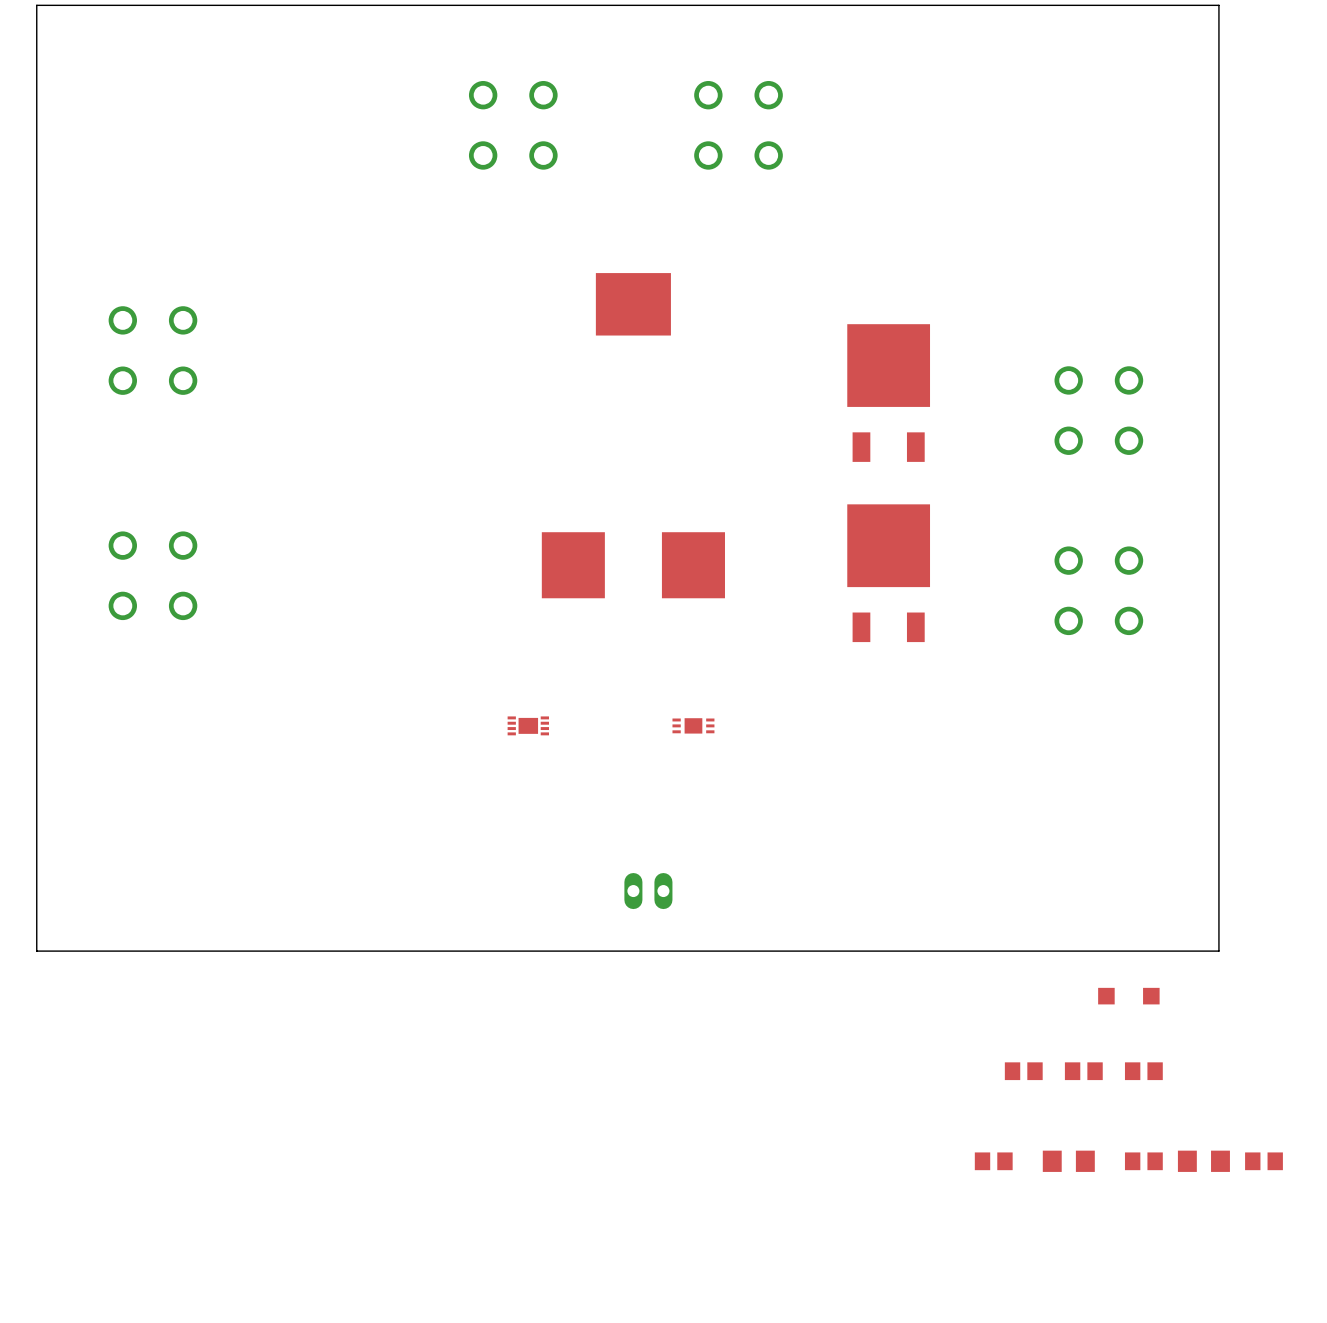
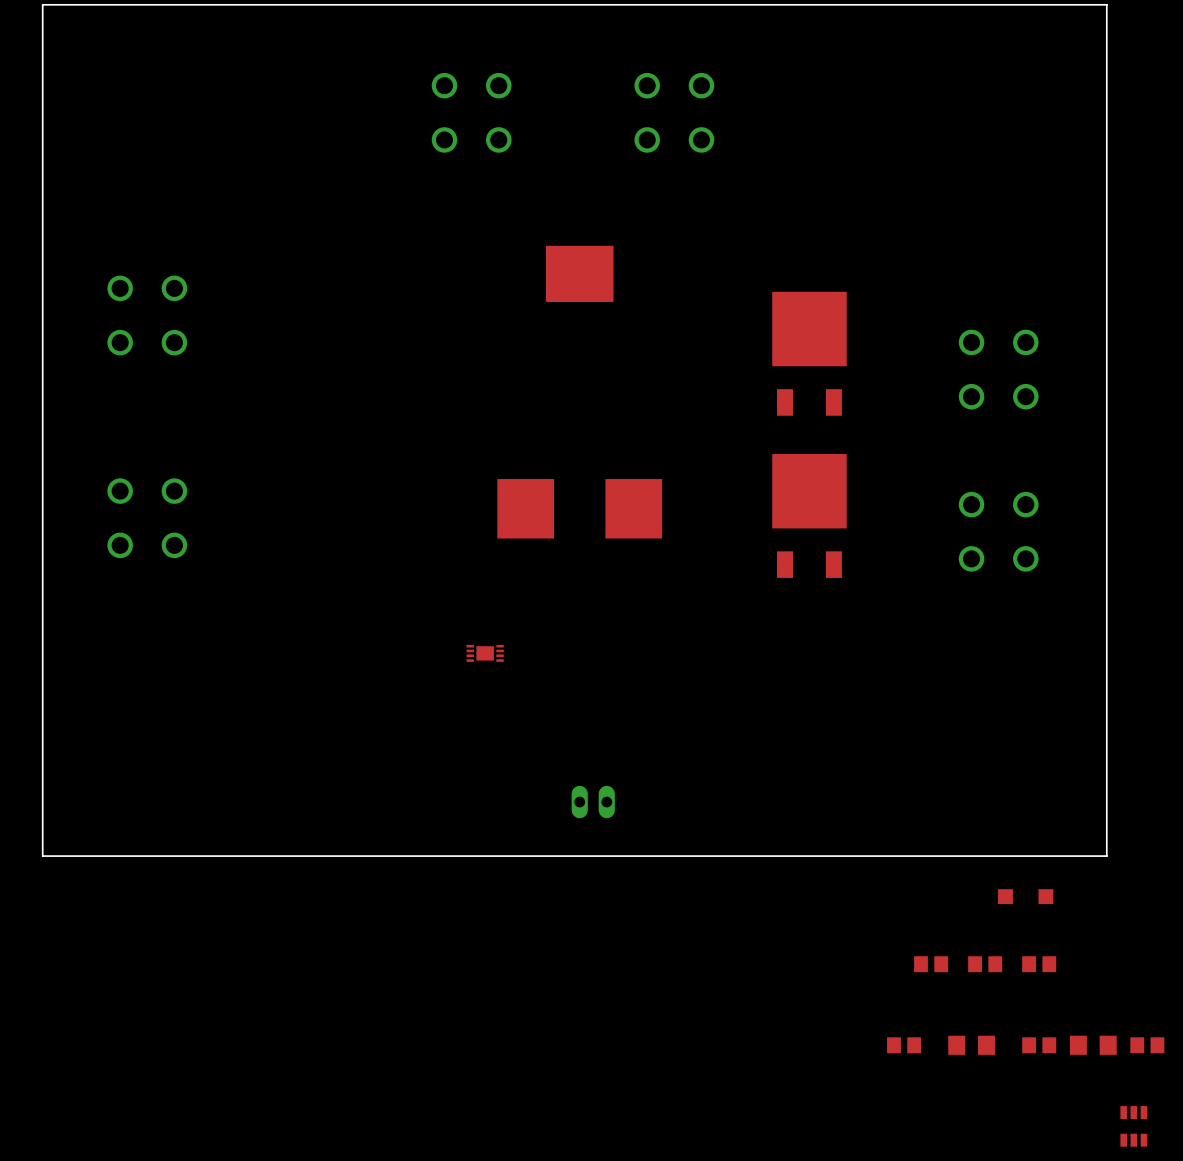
part: (693, 725) -> none
part: none -> (1133, 1126)

